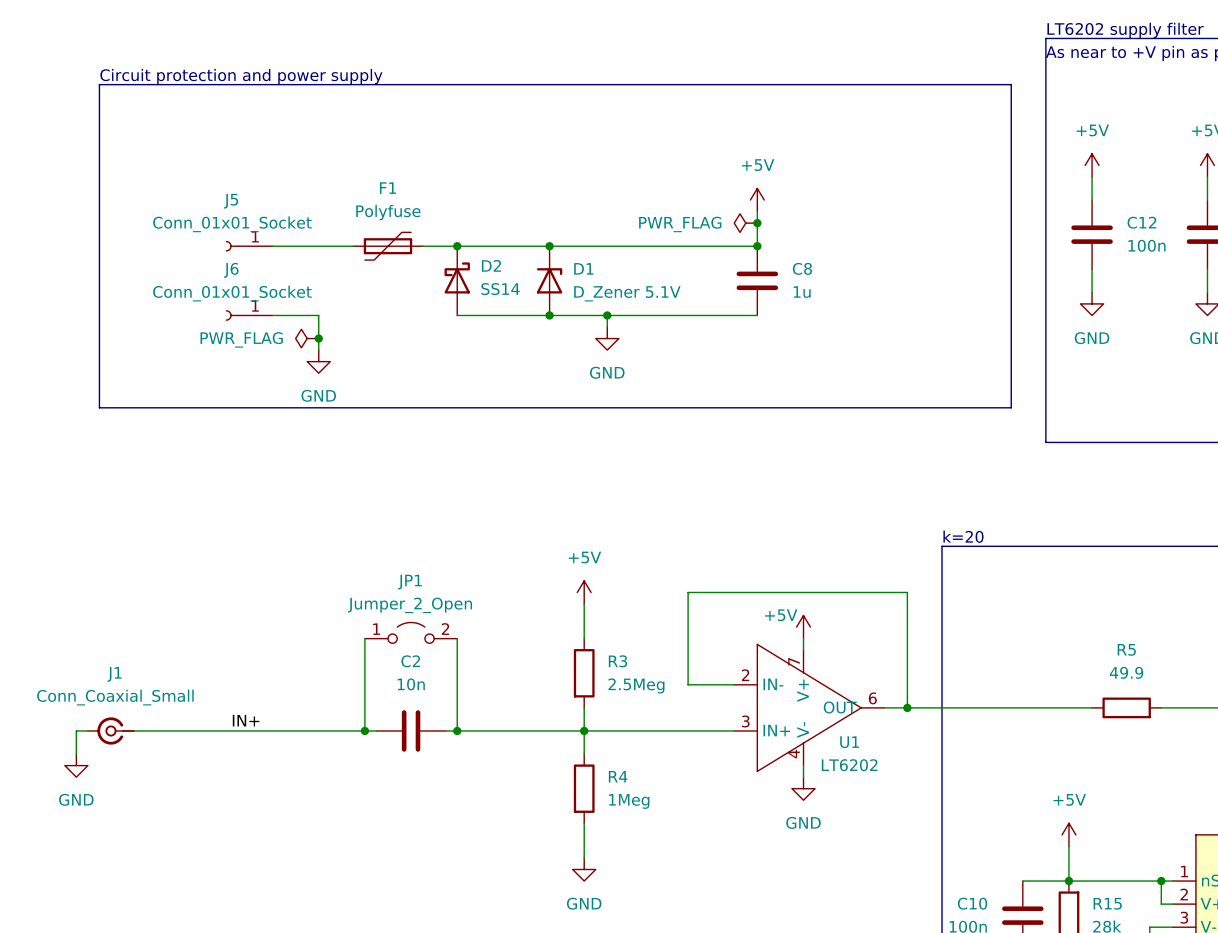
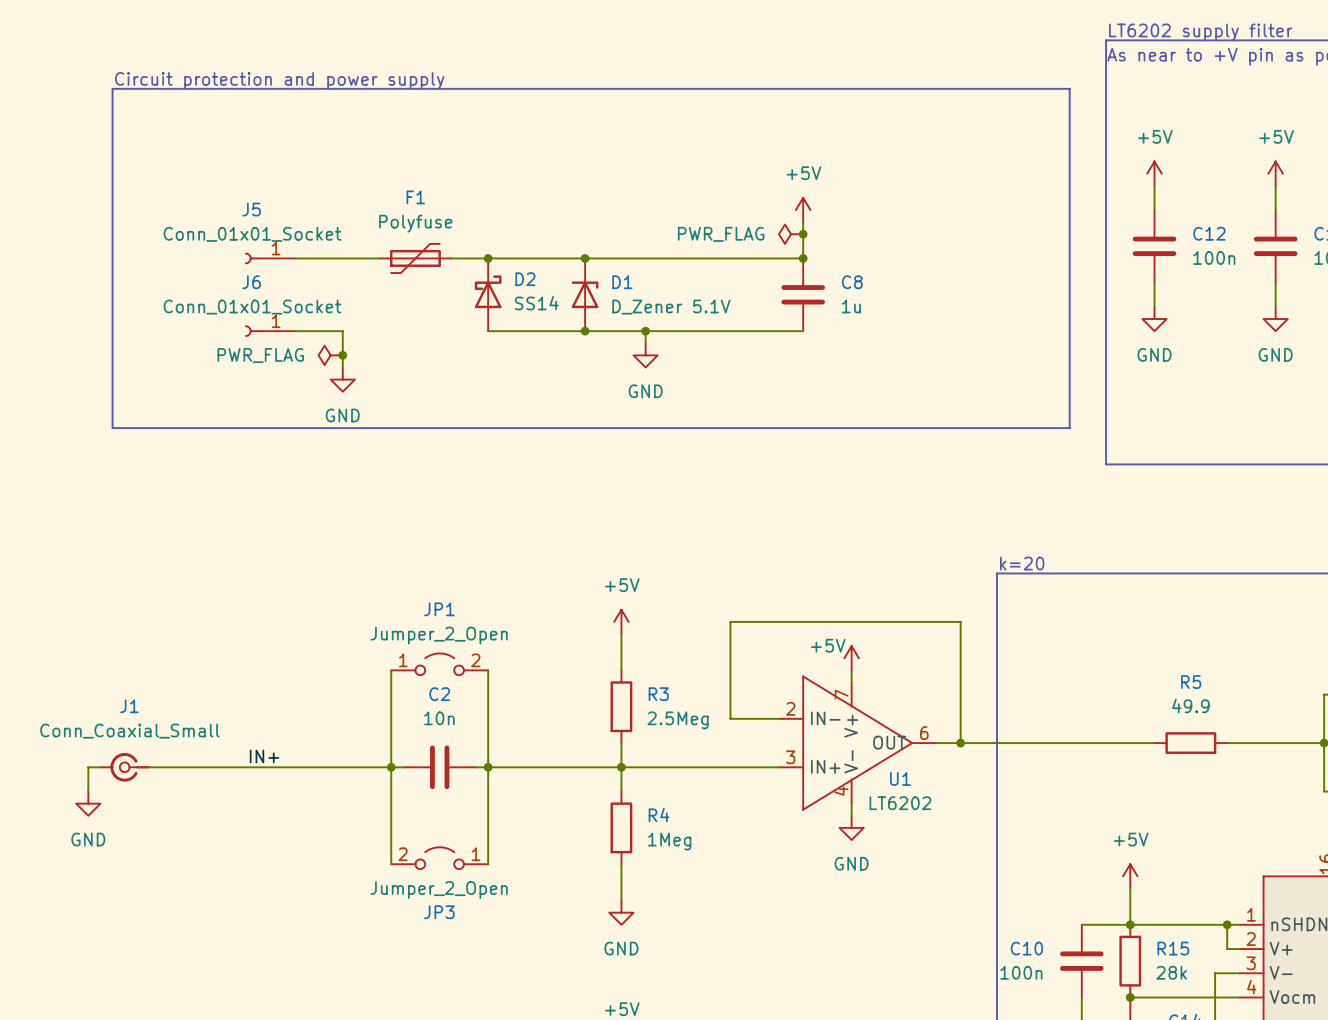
wire: none -> (391, 767) (391, 864)
wire: none -> (488, 767) (488, 864)
JP3: none -> Jumper_2_Open (439, 858)

